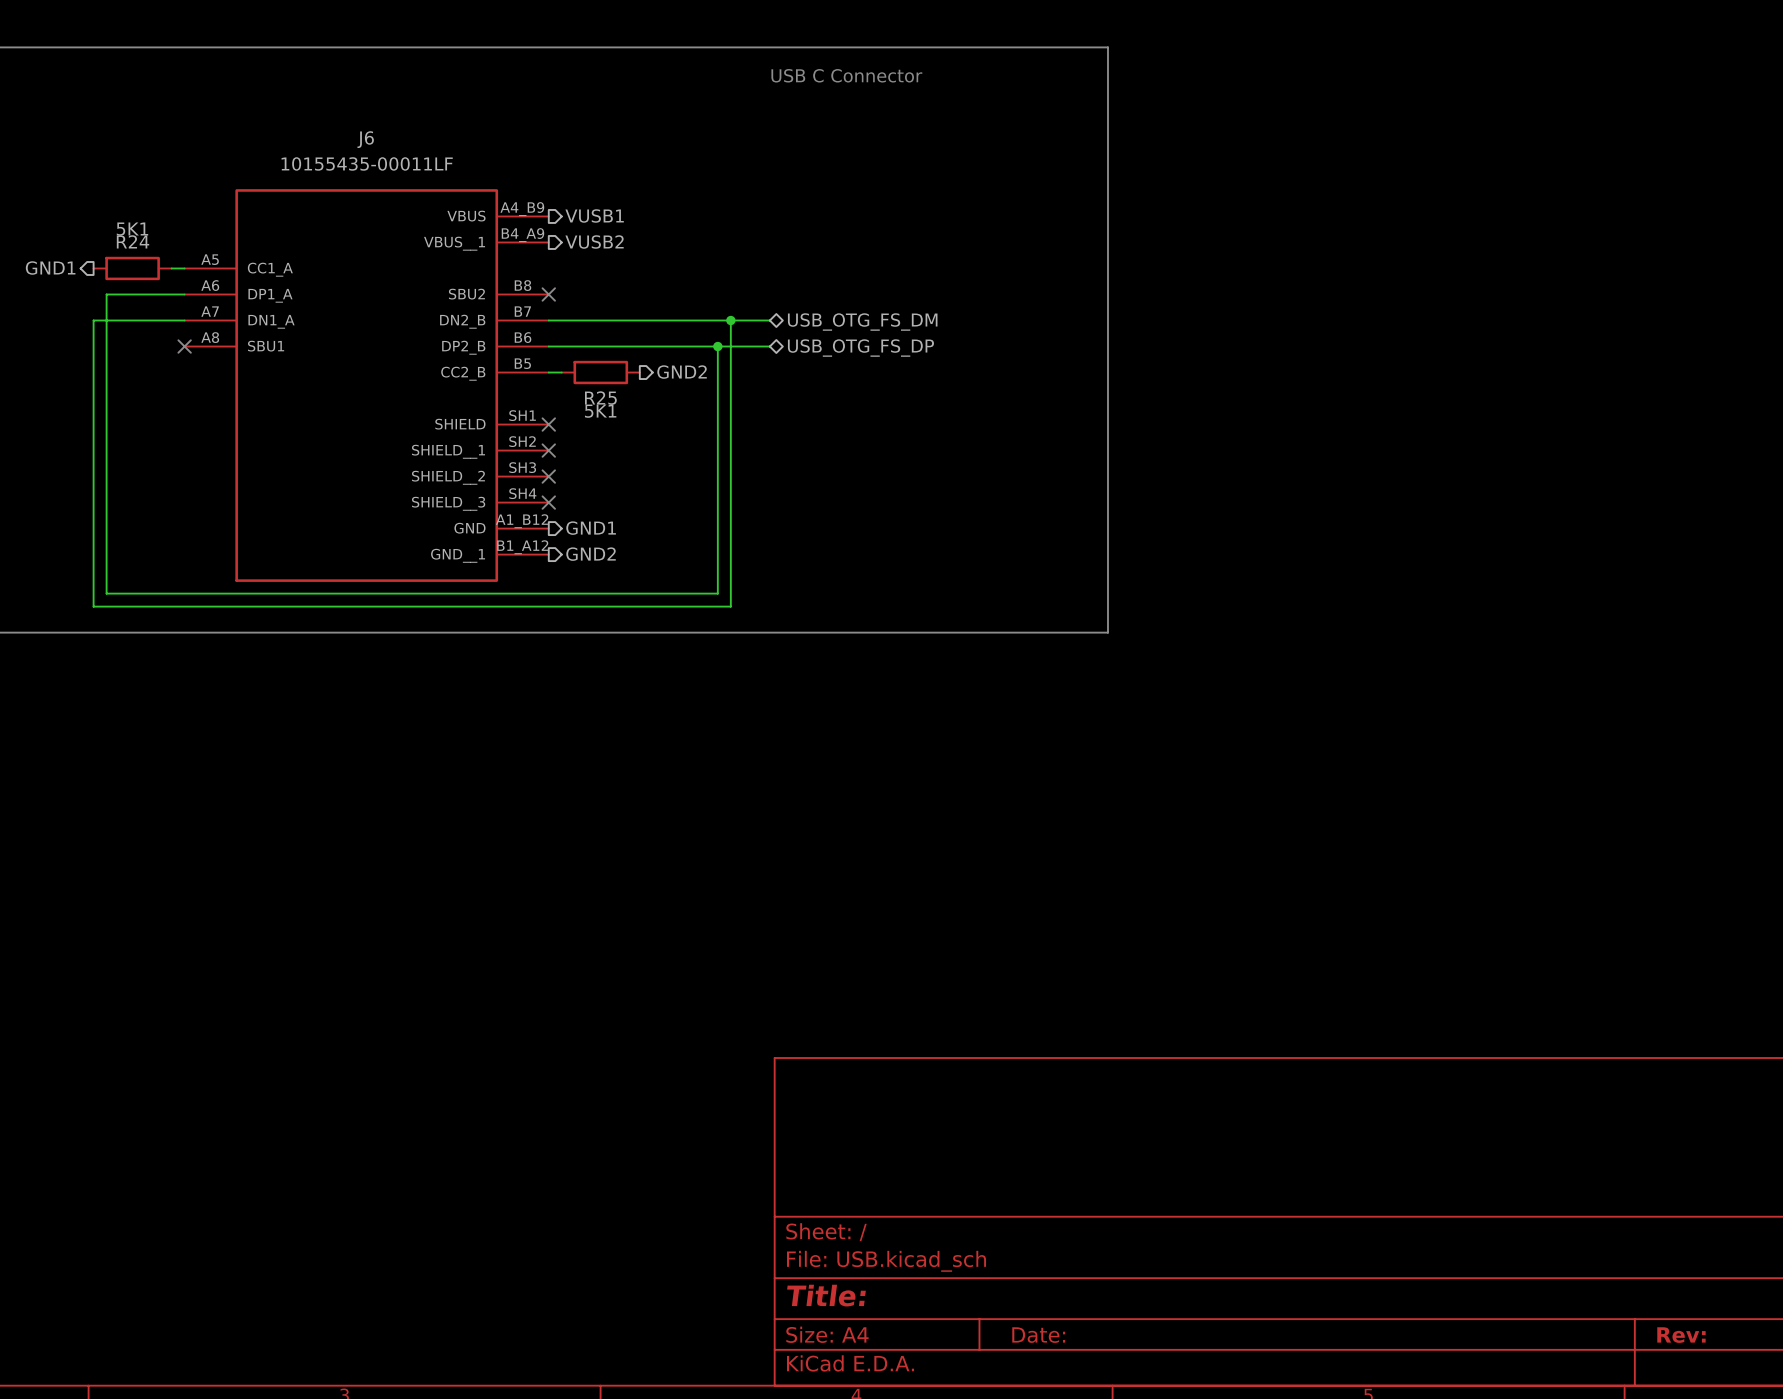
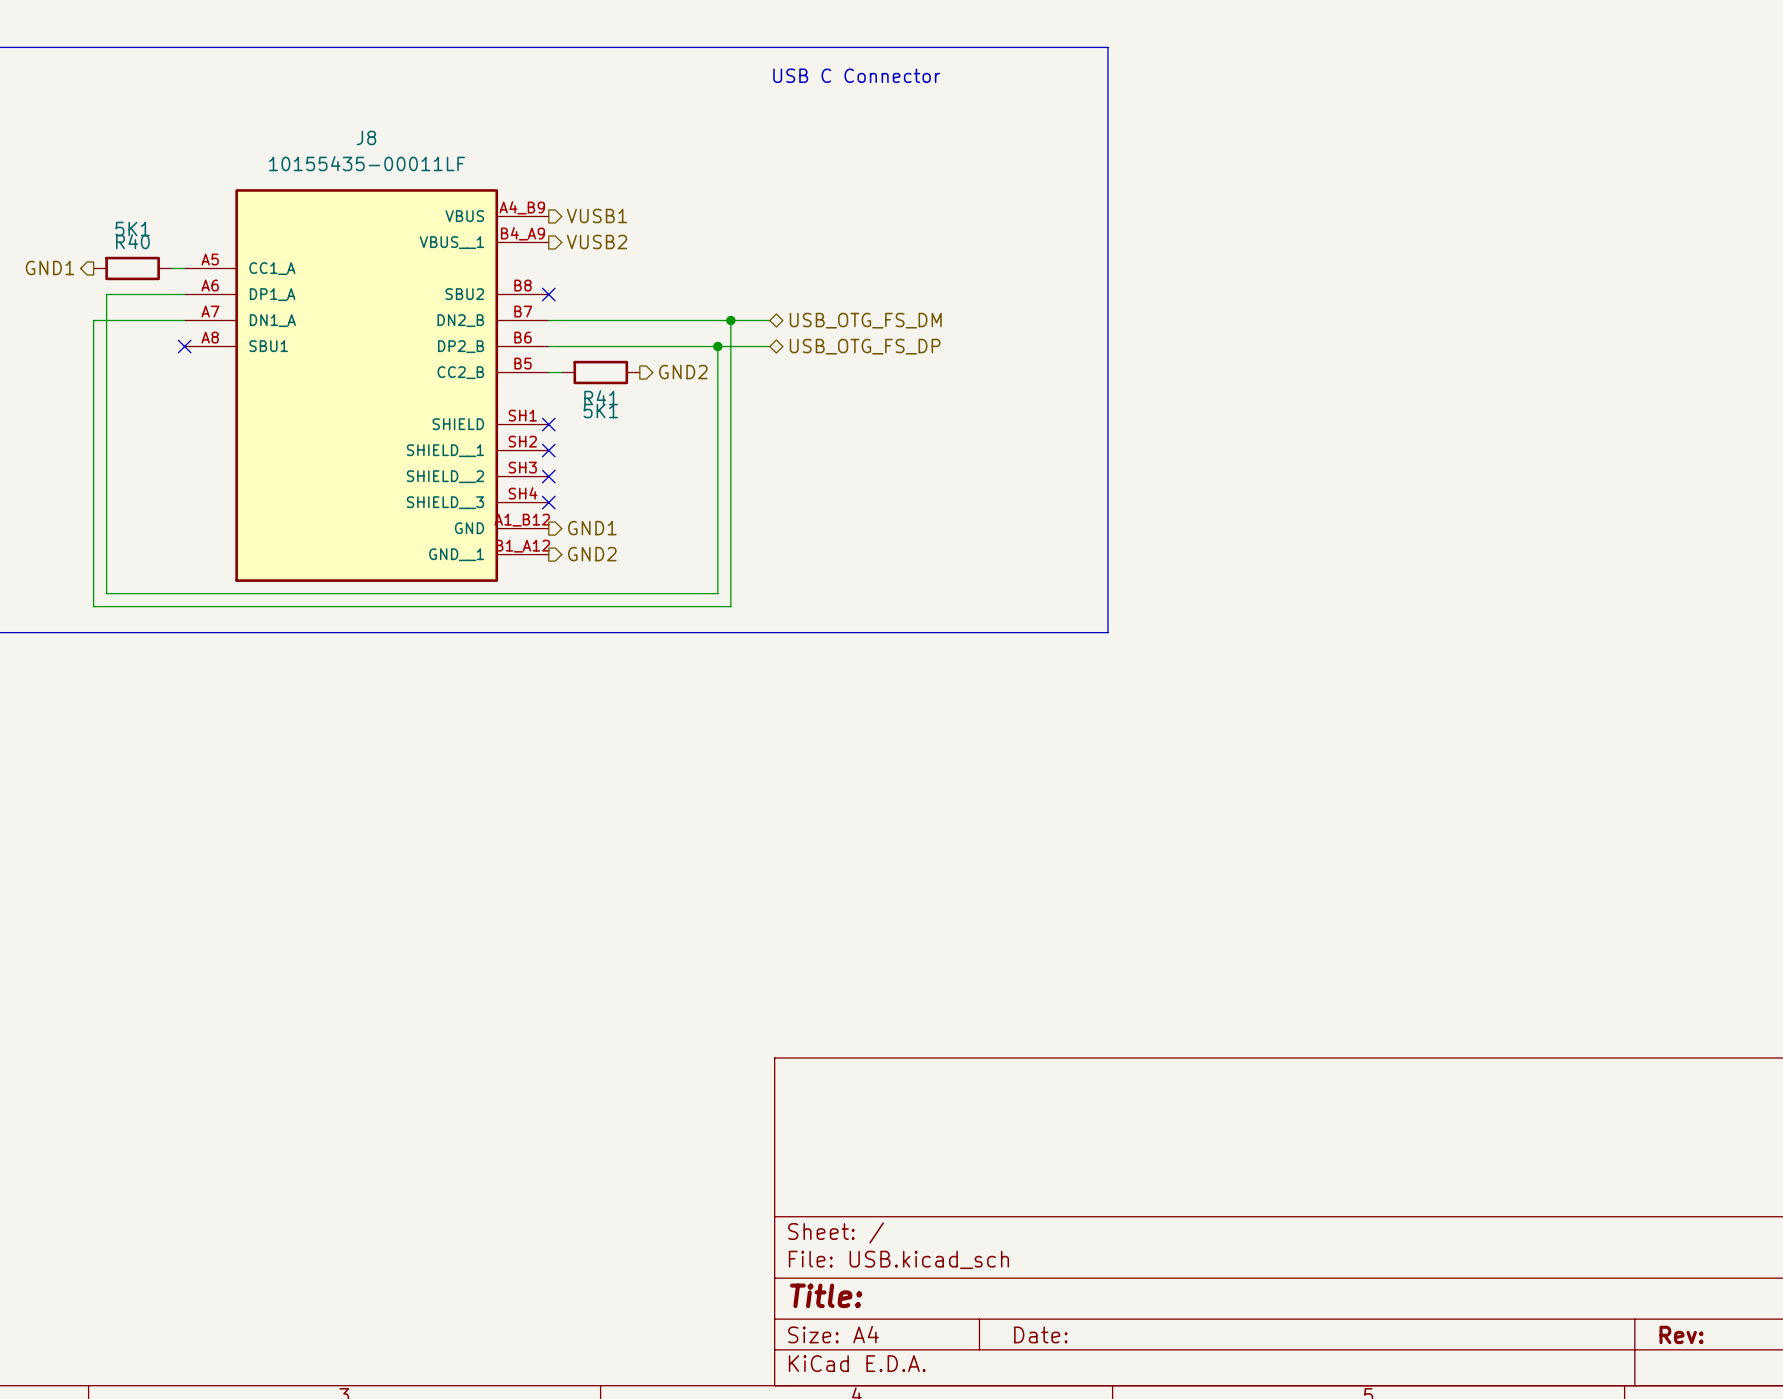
J6 name: J6 (365, 139) -> J8 (366, 137)
R24 name: R24 (132, 241) -> R40 (132, 241)
R25 name: R25 (600, 398) -> R41 (601, 397)

